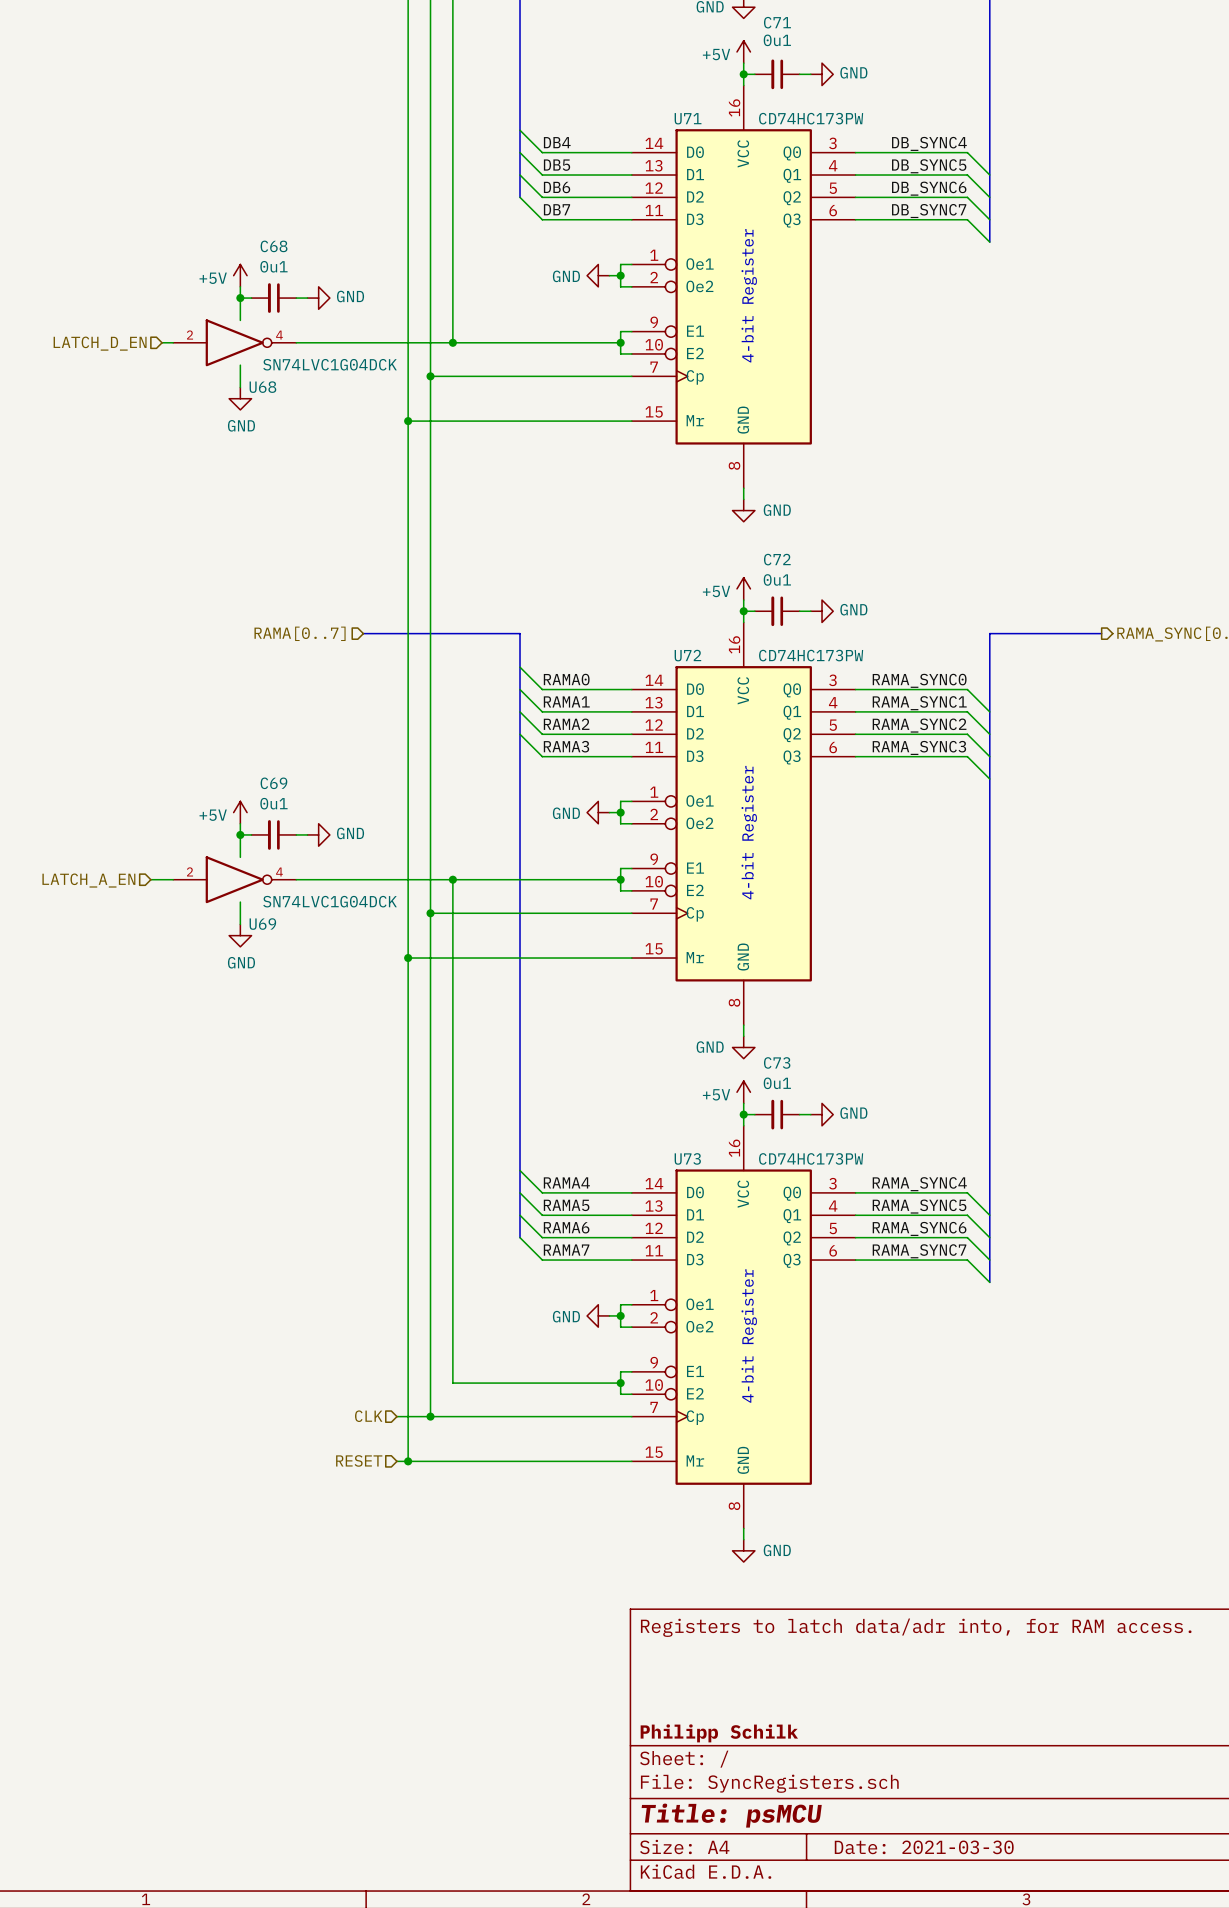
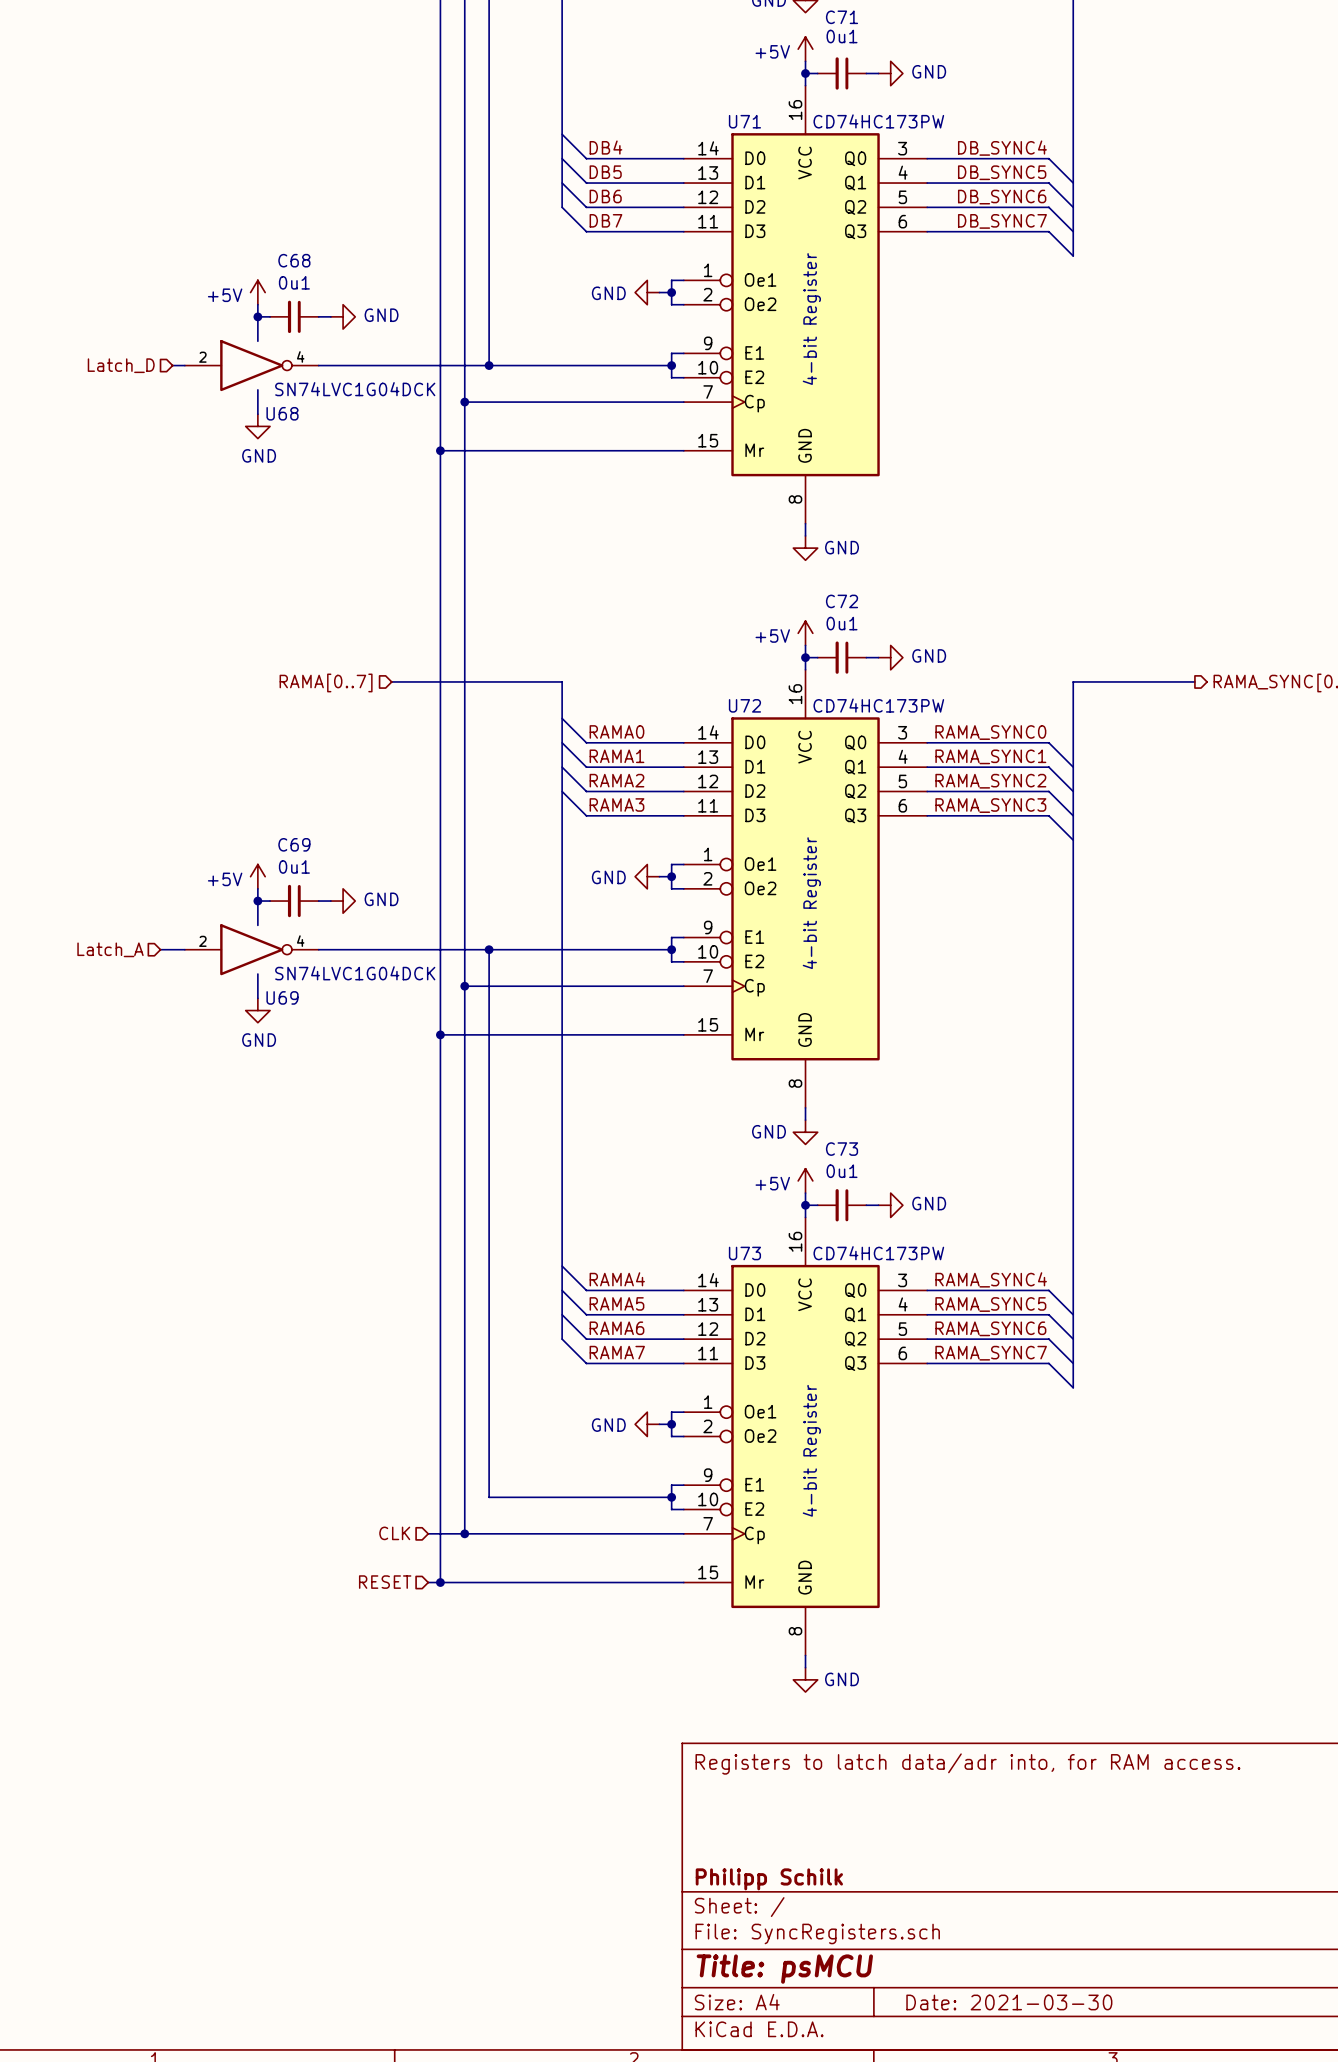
hierarchical label: LATCH_D_EN (100, 343) -> Latch_D (121, 365)
hierarchical label: LATCH_A_EN (88, 880) -> Latch_A (110, 949)

